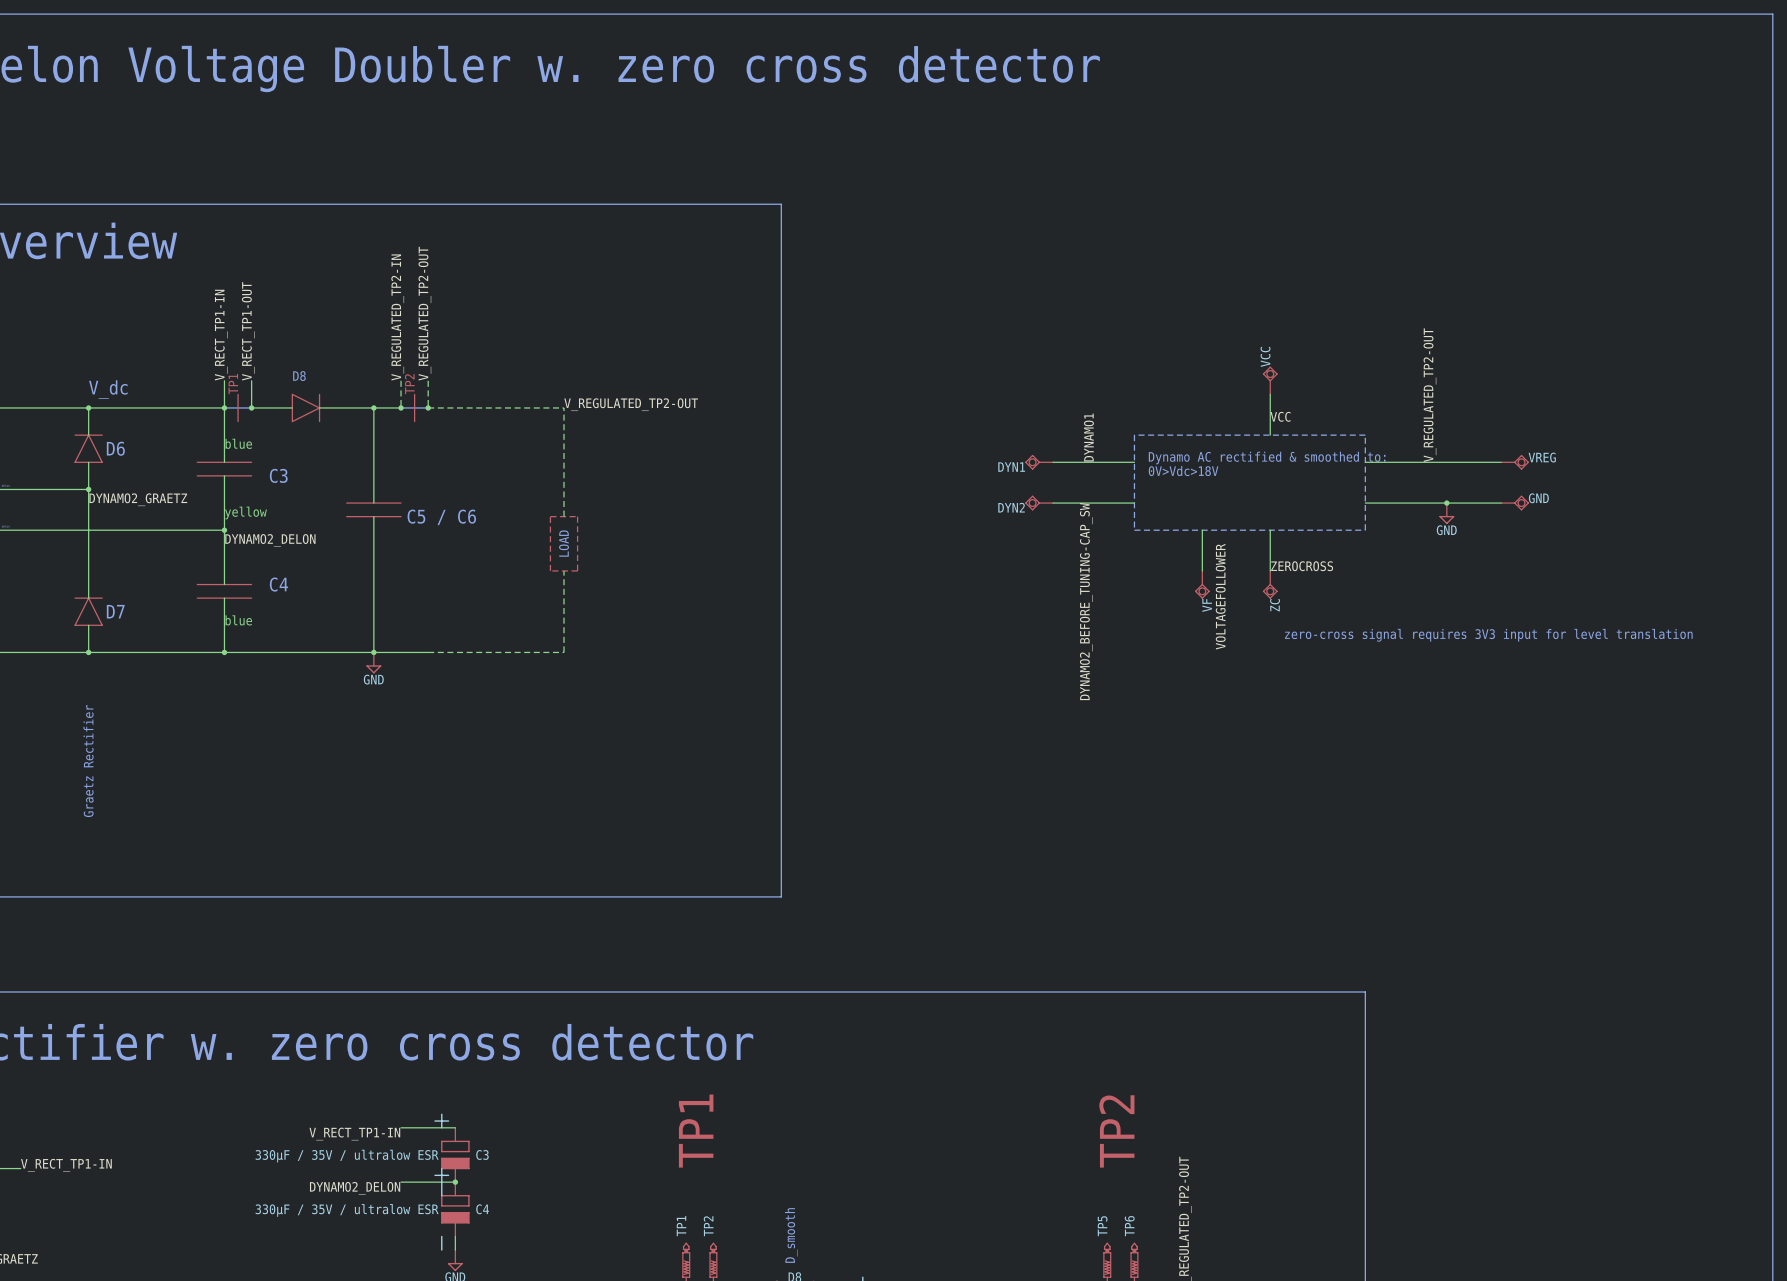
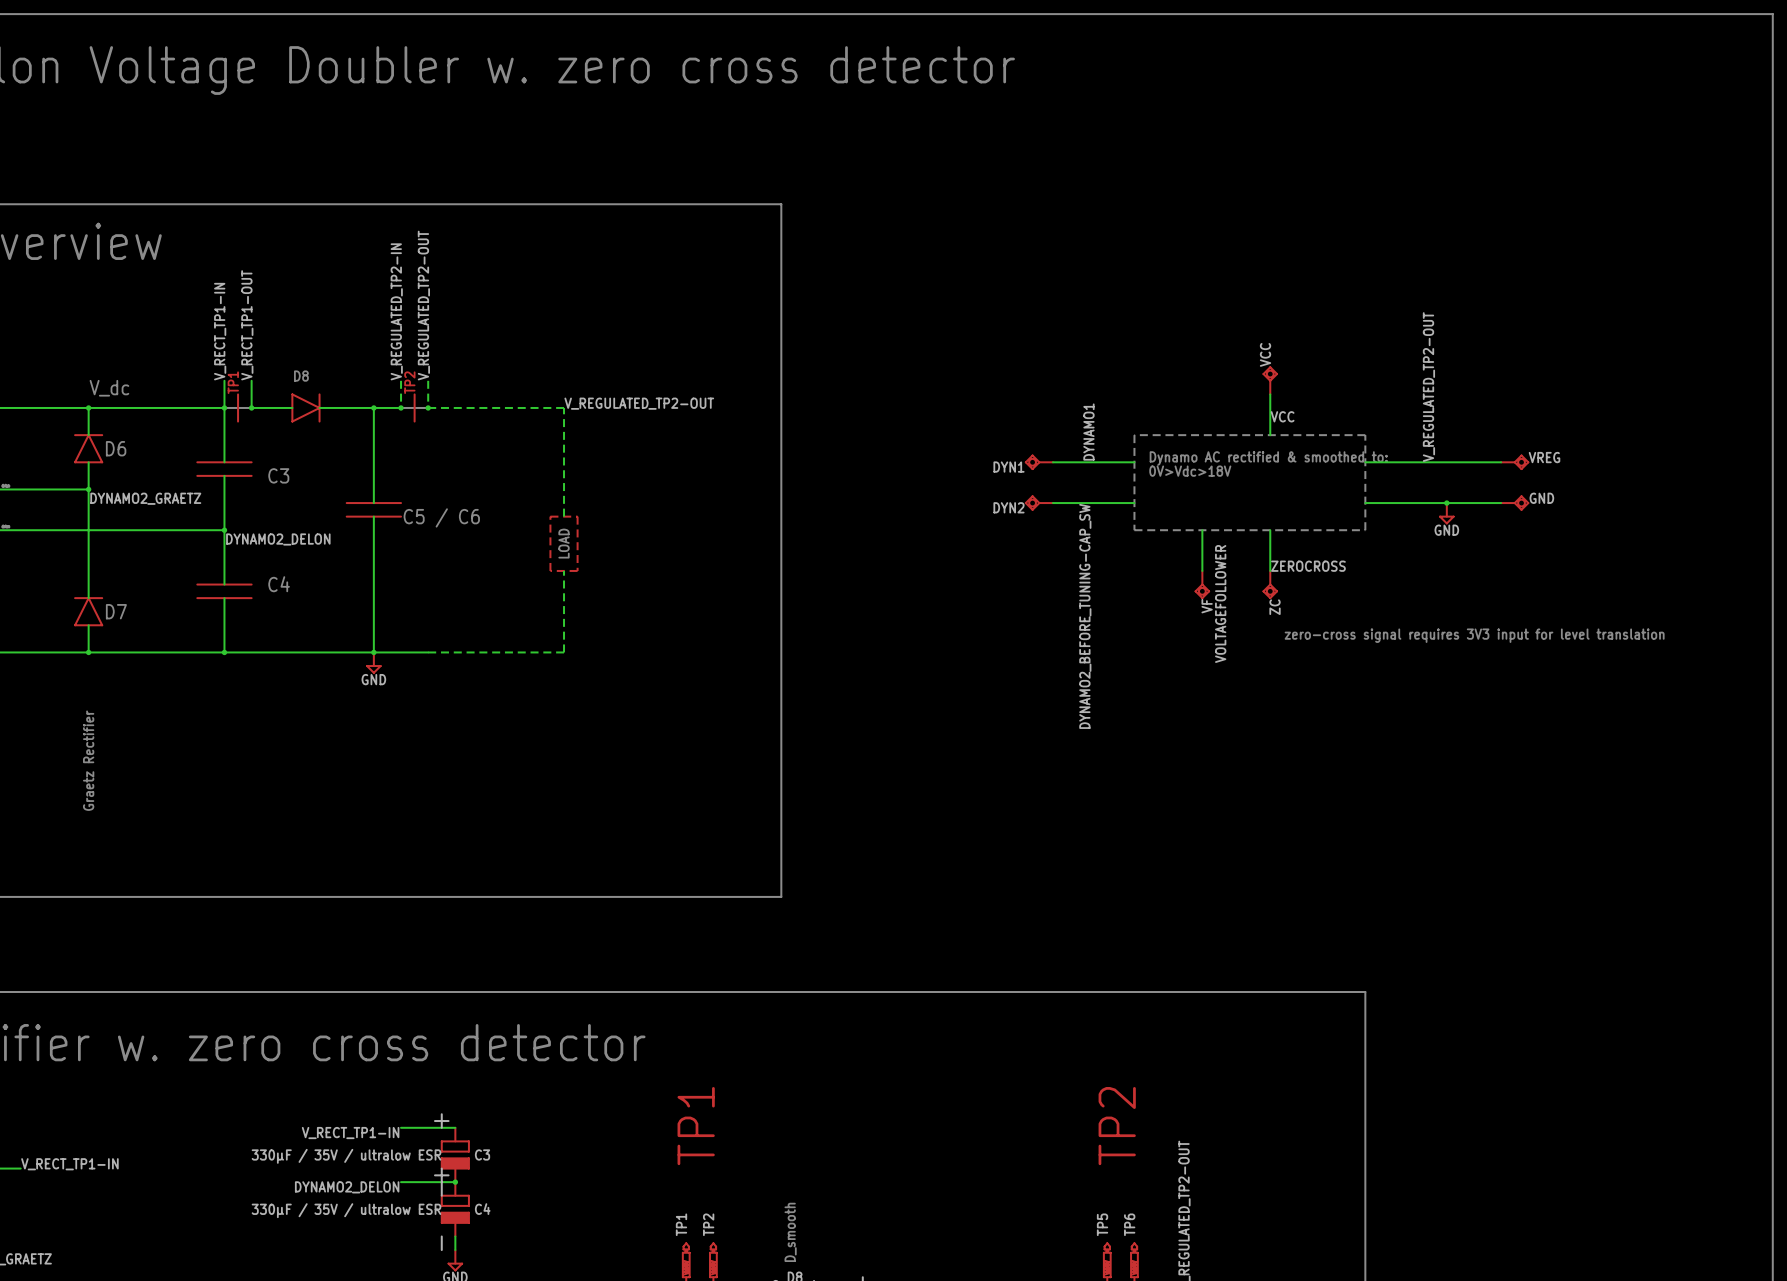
text: blue (238, 443) -> none
text: yellow (245, 513) -> none
text: blue (238, 620) -> none

